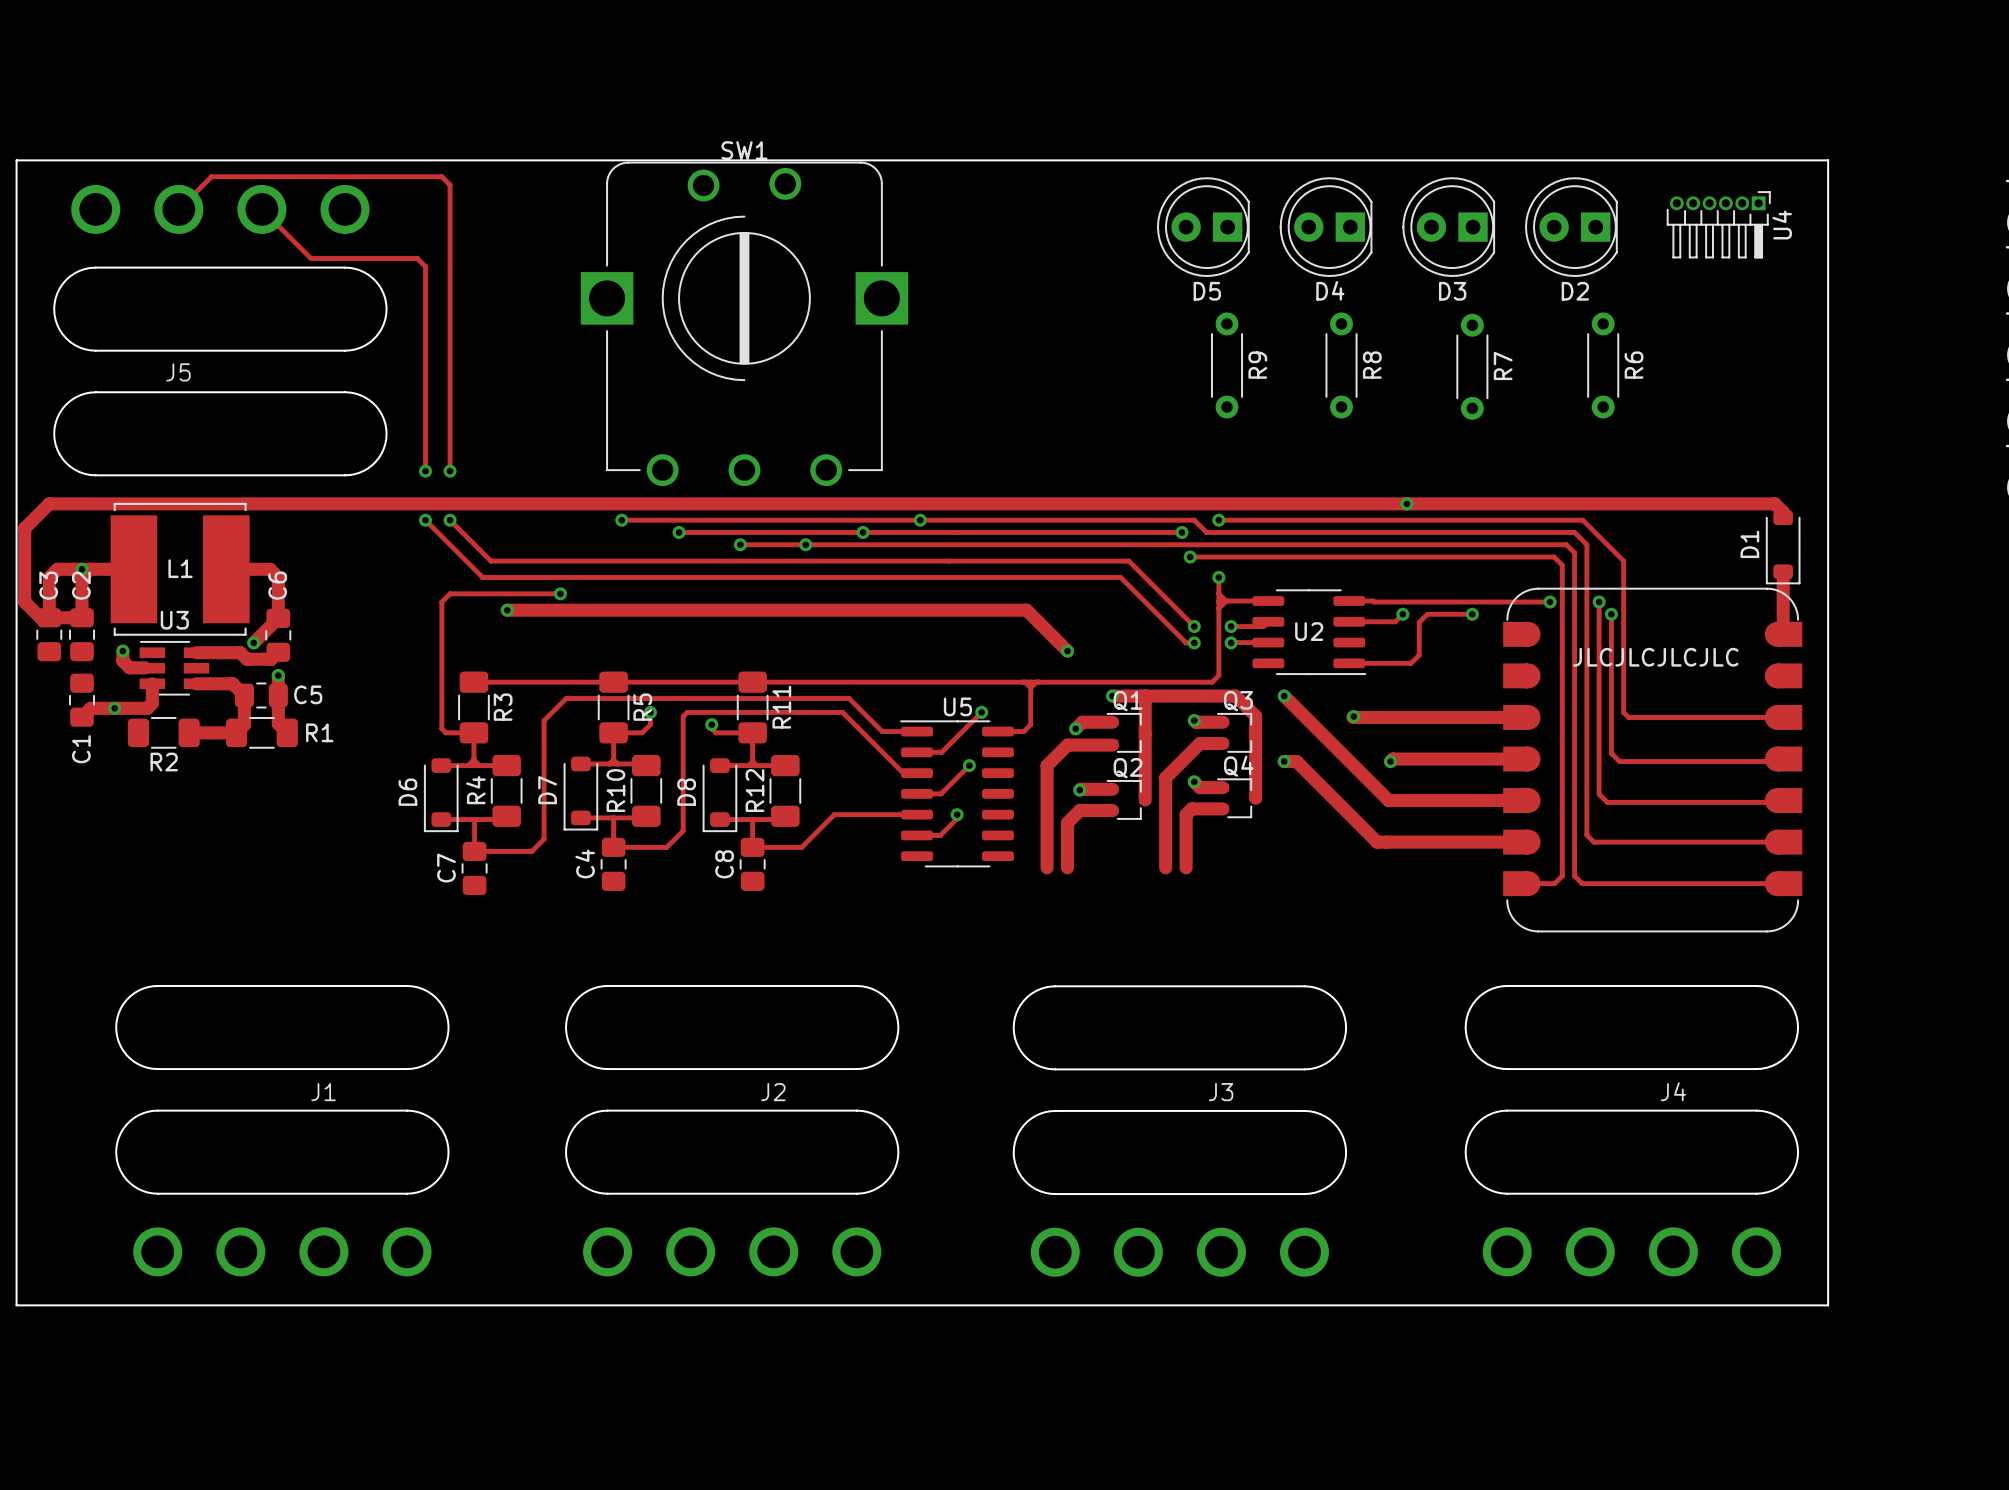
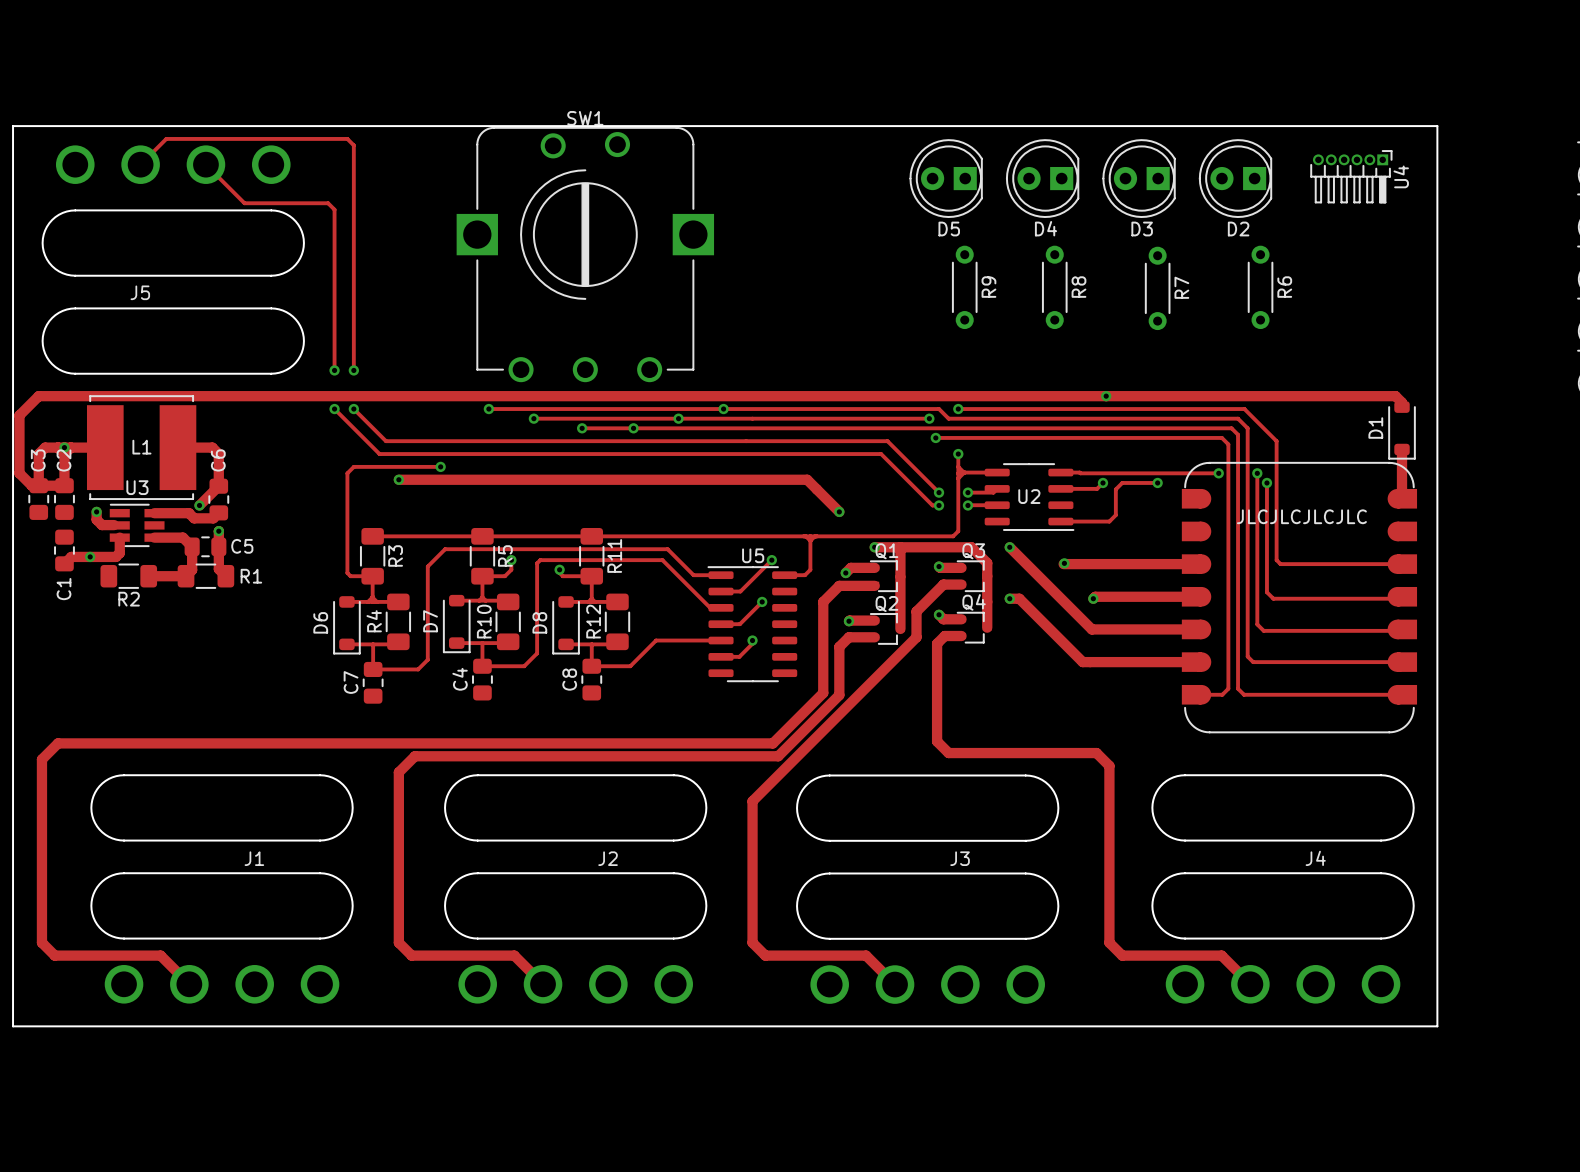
track: (1201, 808) (1191, 808) (1186, 814) (1186, 867) -> (944, 636) (937, 643) (937, 741) (948, 753) (1096, 753) (1109, 765) (1109, 942) (1122, 955) (1221, 955) (1250, 984)
track: (1165, 810) (1165, 867) -> (916, 637) (752, 801) (752, 942) (765, 955) (866, 955) (895, 984)
track: none -> (823, 682) (823, 693) (772, 743) (58, 743) (41, 759) (41, 942) (54, 955) (160, 955) (189, 984)
track: none -> (839, 682) (839, 695) (778, 756) (414, 756) (398, 772) (398, 942) (411, 955) (514, 955) (543, 984)

